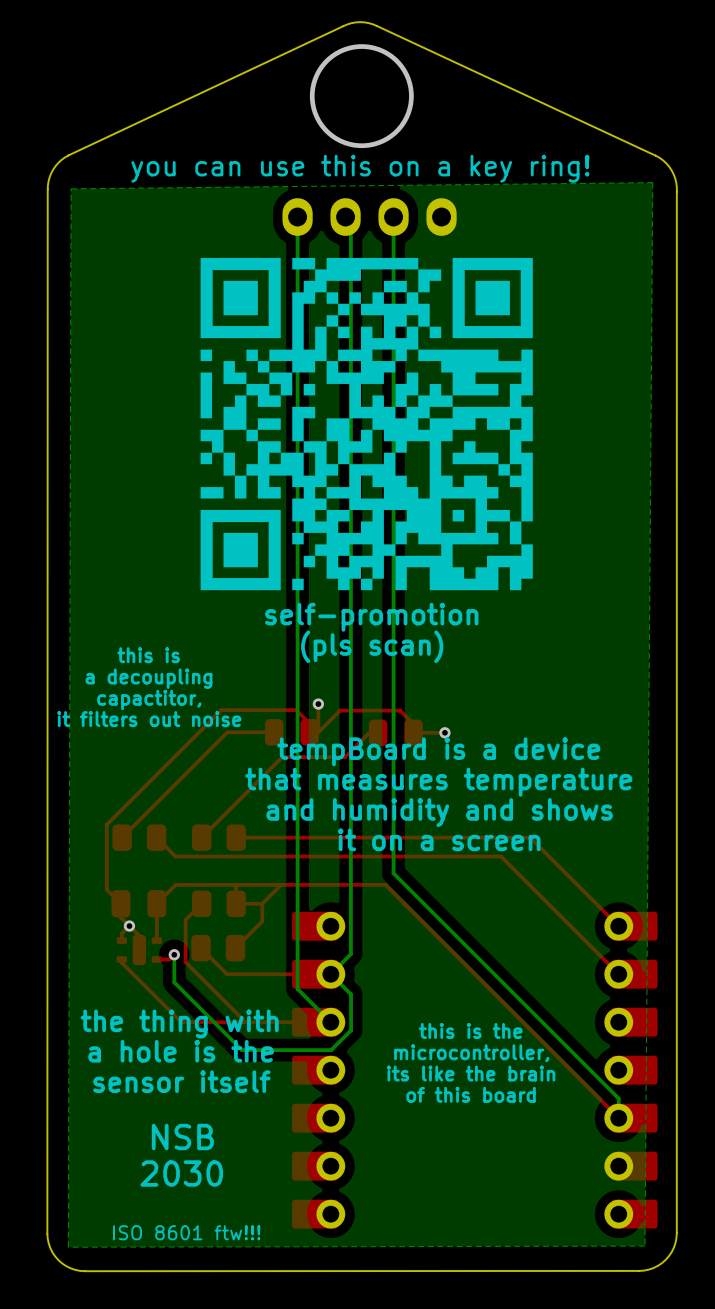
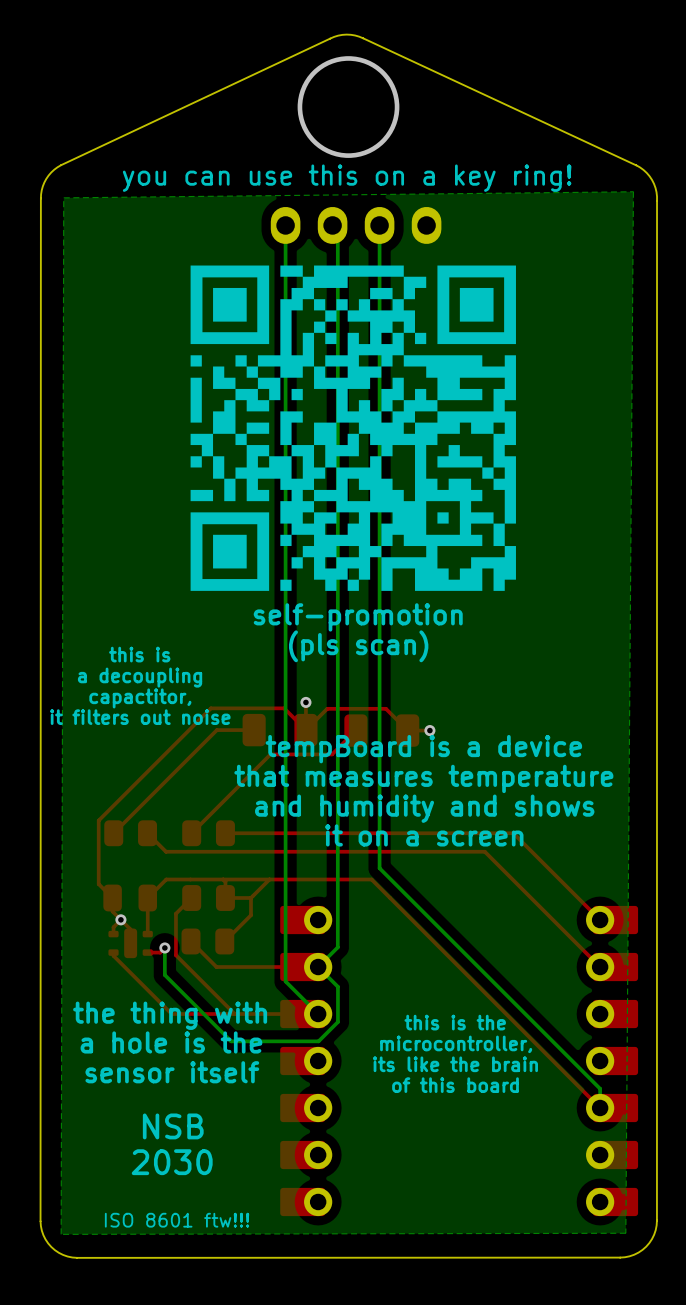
part footprint: [265, 719, 319, 746] -> [242, 713, 318, 747]
part footprint: [368, 719, 423, 747] -> [344, 714, 420, 747]

